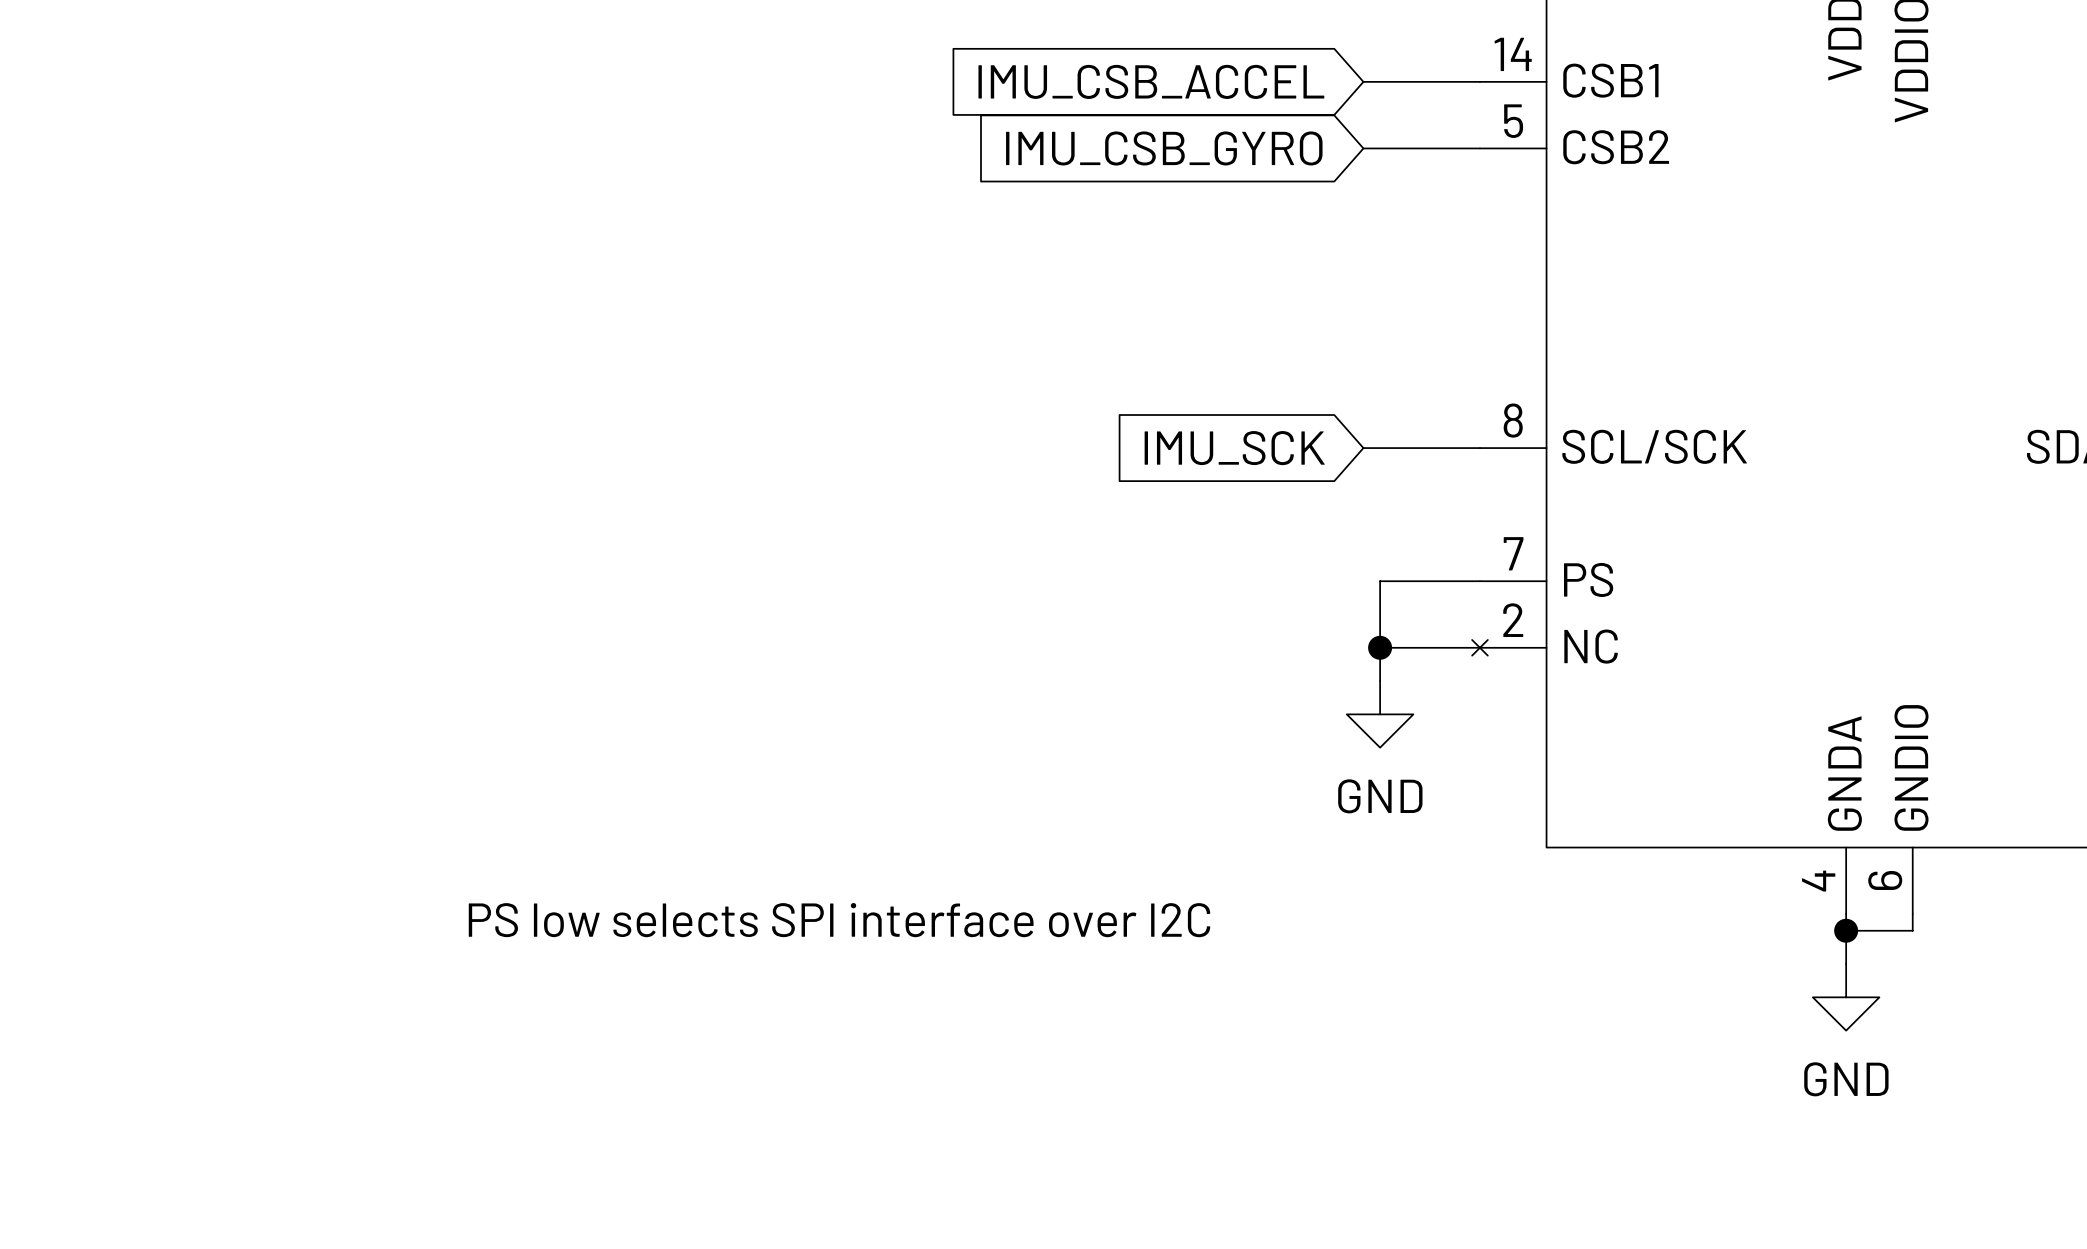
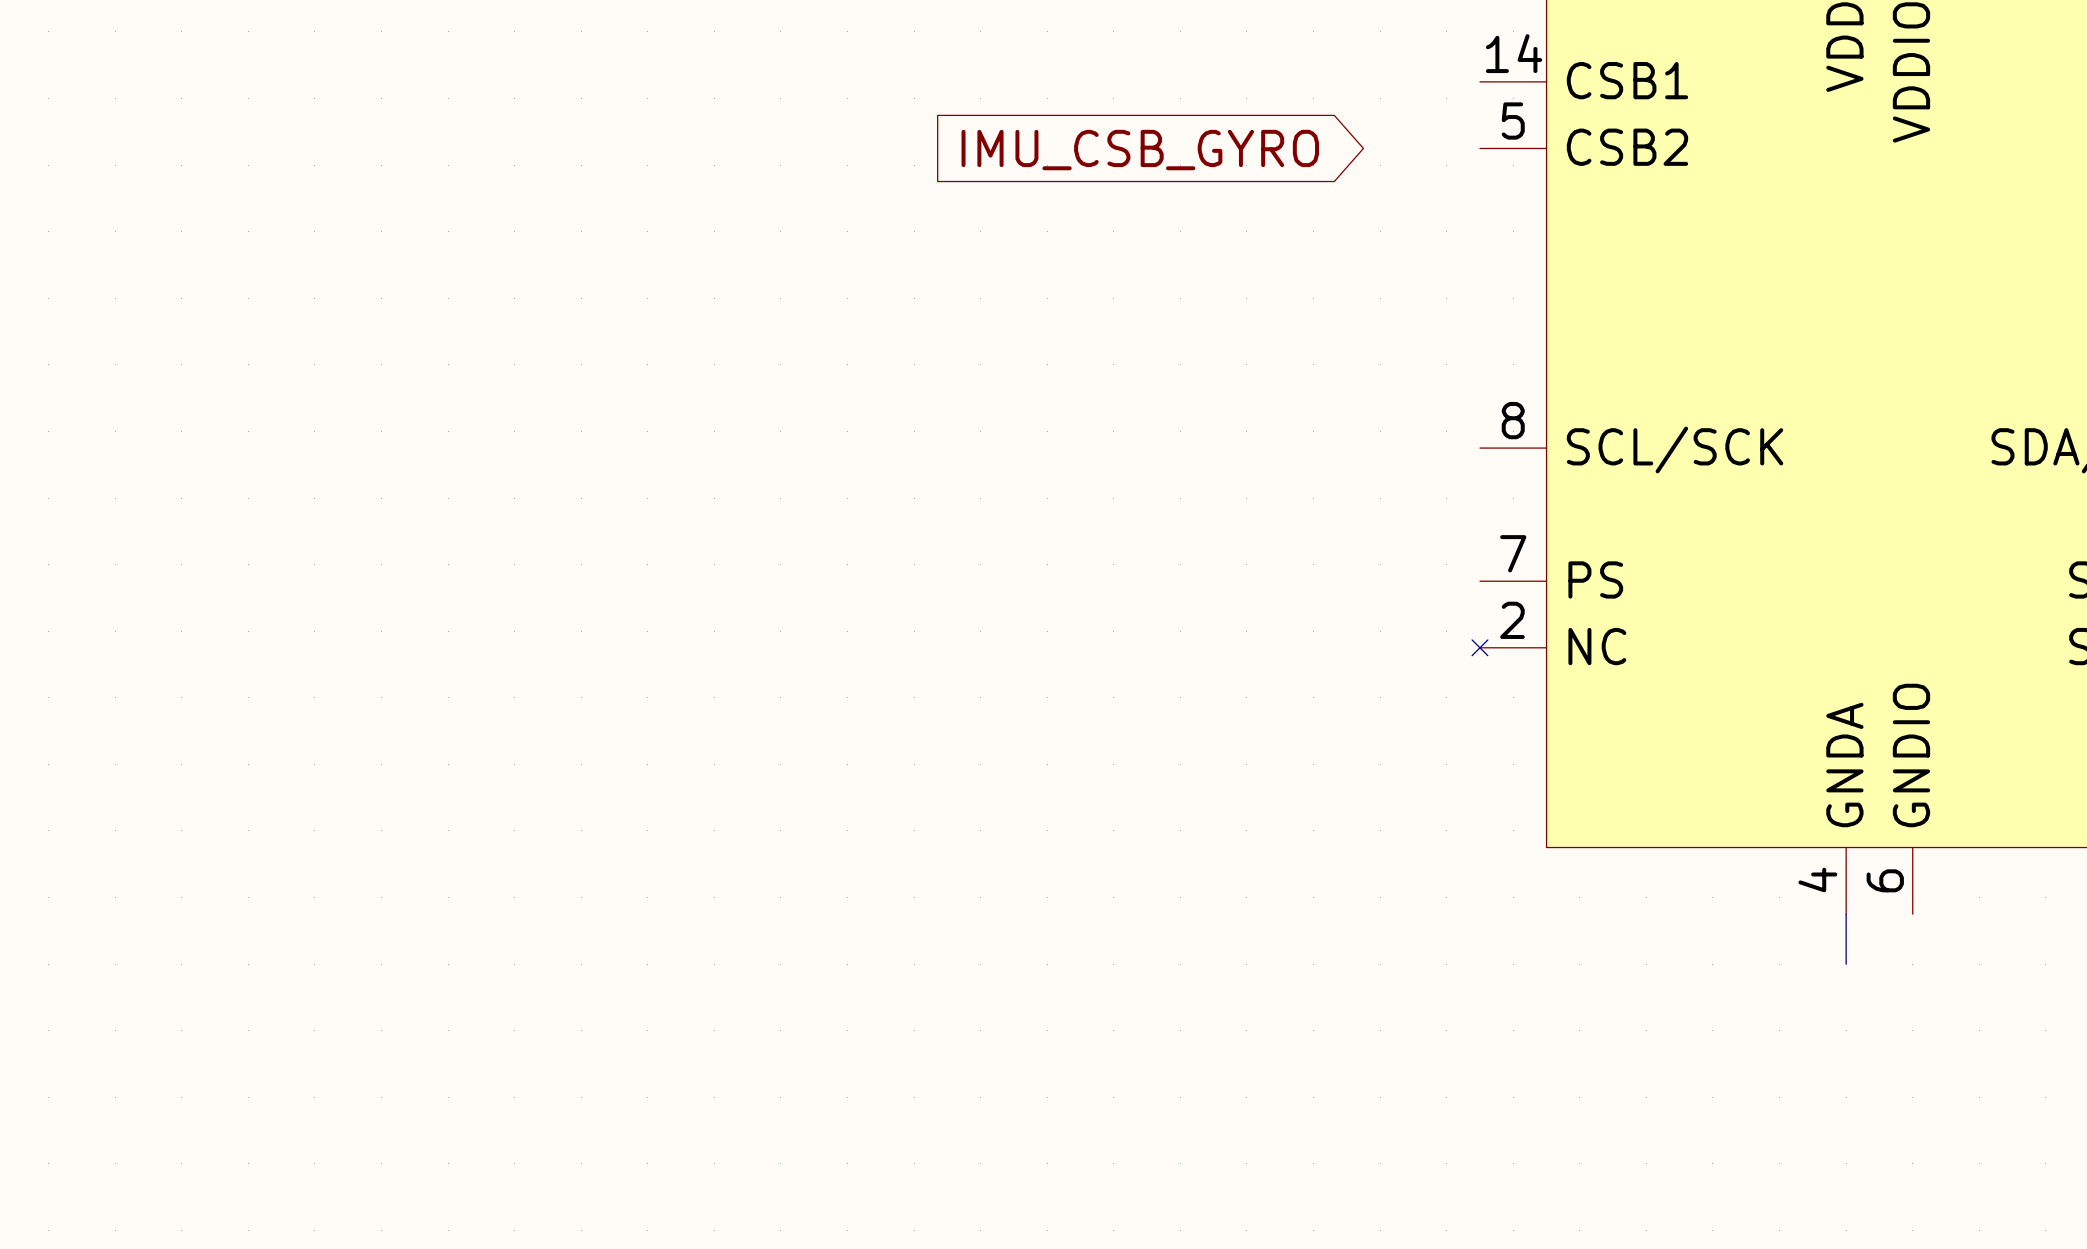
global label: IMU_CSB_ACCEL (1151, 81) -> none
wire: (1363, 81) (1479, 81) -> none
wire: (1363, 148) (1479, 148) -> none
global label: IMU_SCK (1234, 448) -> none
wire: (1363, 448) (1479, 448) -> none
wire: (1479, 581) (1380, 581) (1380, 681) -> none
wire: (1380, 647) (1479, 647) -> none
junction: (1380, 647) -> none
power symbol: GND (1380, 714) -> none
wire: (1912, 914) (1912, 930) (1846, 930) -> none
text: PS low selects SPI interface over I2C (839, 920) -> none
junction: (1846, 930) -> none
power symbol: GND (1846, 997) -> none

